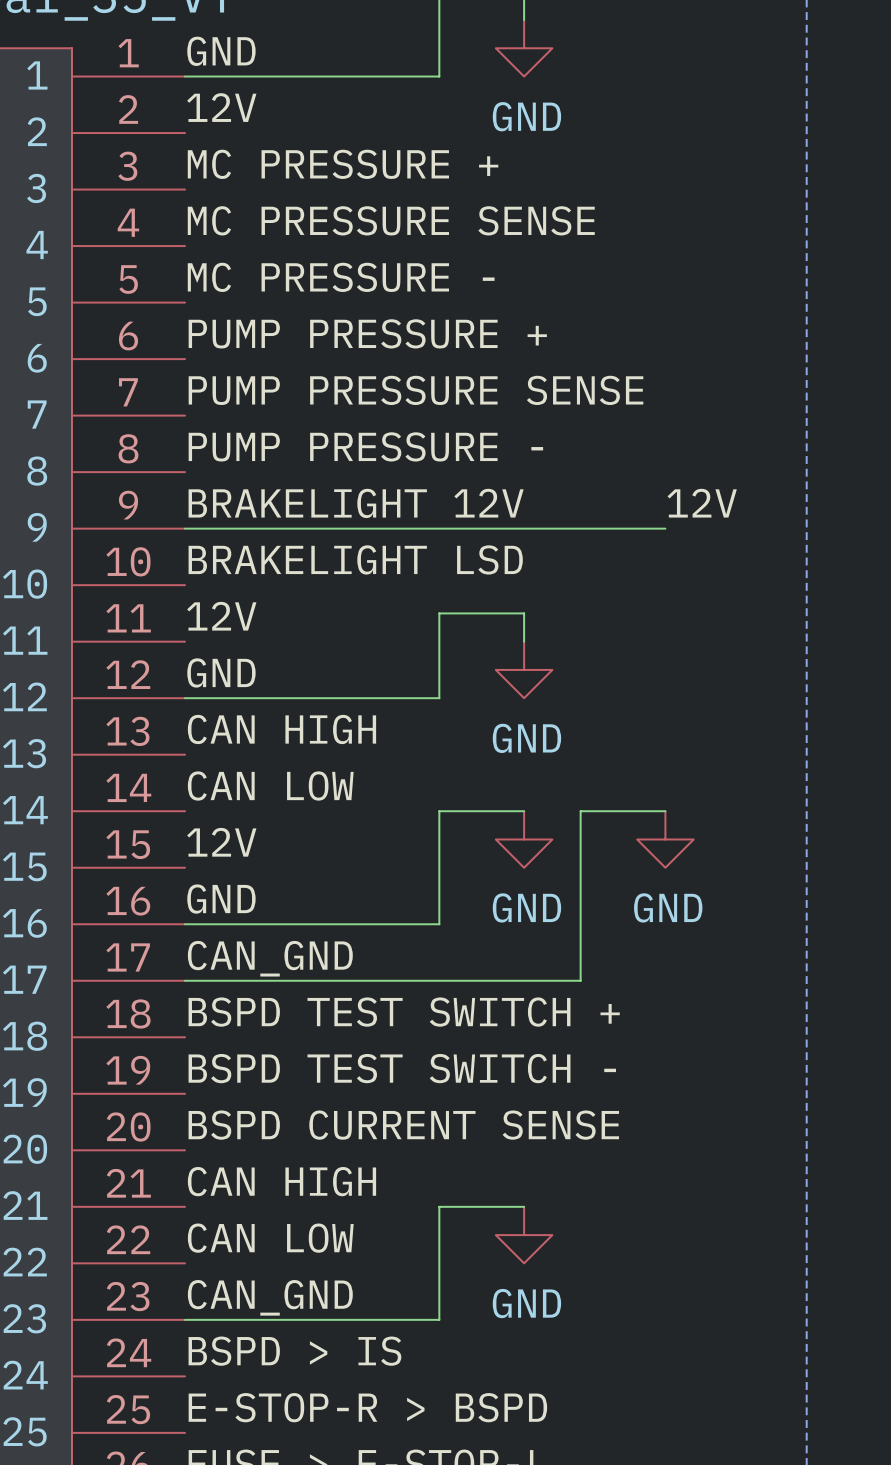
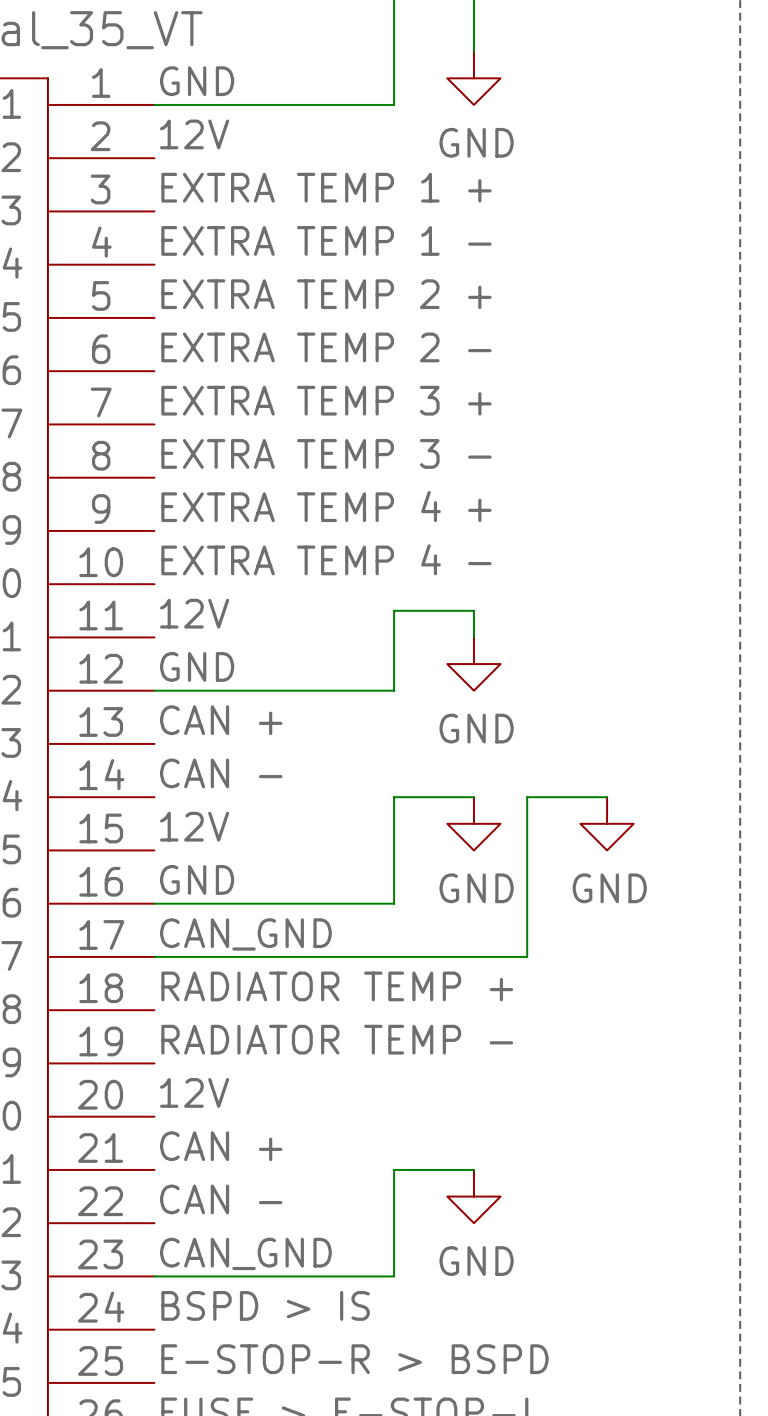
label: MC PRESSURE + (343, 164) -> EXTRA TEMP 1 + (326, 187)
label: MC PRESSURE SENSE (391, 220) -> EXTRA TEMP 1 - (326, 240)
label: MC PRESSURE - (341, 277) -> EXTRA TEMP 2 + (326, 294)
label: PUMP PRESSURE + (367, 333) -> EXTRA TEMP 2 - (326, 347)
label: PUMP PRESSURE SENSE (415, 390) -> EXTRA TEMP 3 + (326, 400)
label: PUMP PRESSURE - (365, 446) -> EXTRA TEMP 3 - (326, 453)
label: BRAKELIGHT 12V (356, 503) -> EXTRA TEMP 4 + (326, 506)
label: 12V (702, 503) -> none
wire: (185, 528) (665, 528) -> none
label: BRAKELIGHT LSD (355, 559) -> EXTRA TEMP 4 - (326, 559)
label: CAN HIGH (281, 729) -> CAN + (221, 720)
label: CAN LOW (270, 786) -> CAN - (221, 773)
label: BSPD TEST SWITCH + (404, 1012) -> RADIATOR TEMP + (337, 986)
label: BSPD TEST SWITCH - (402, 1068) -> RADIATOR TEMP - (337, 1039)
label: BSPD CURRENT SENSE (403, 1125) -> 12V (194, 1092)
label: CAN HIGH (281, 1181) -> CAN + (221, 1146)
label: CAN LOW (270, 1238) -> CAN - (221, 1199)

